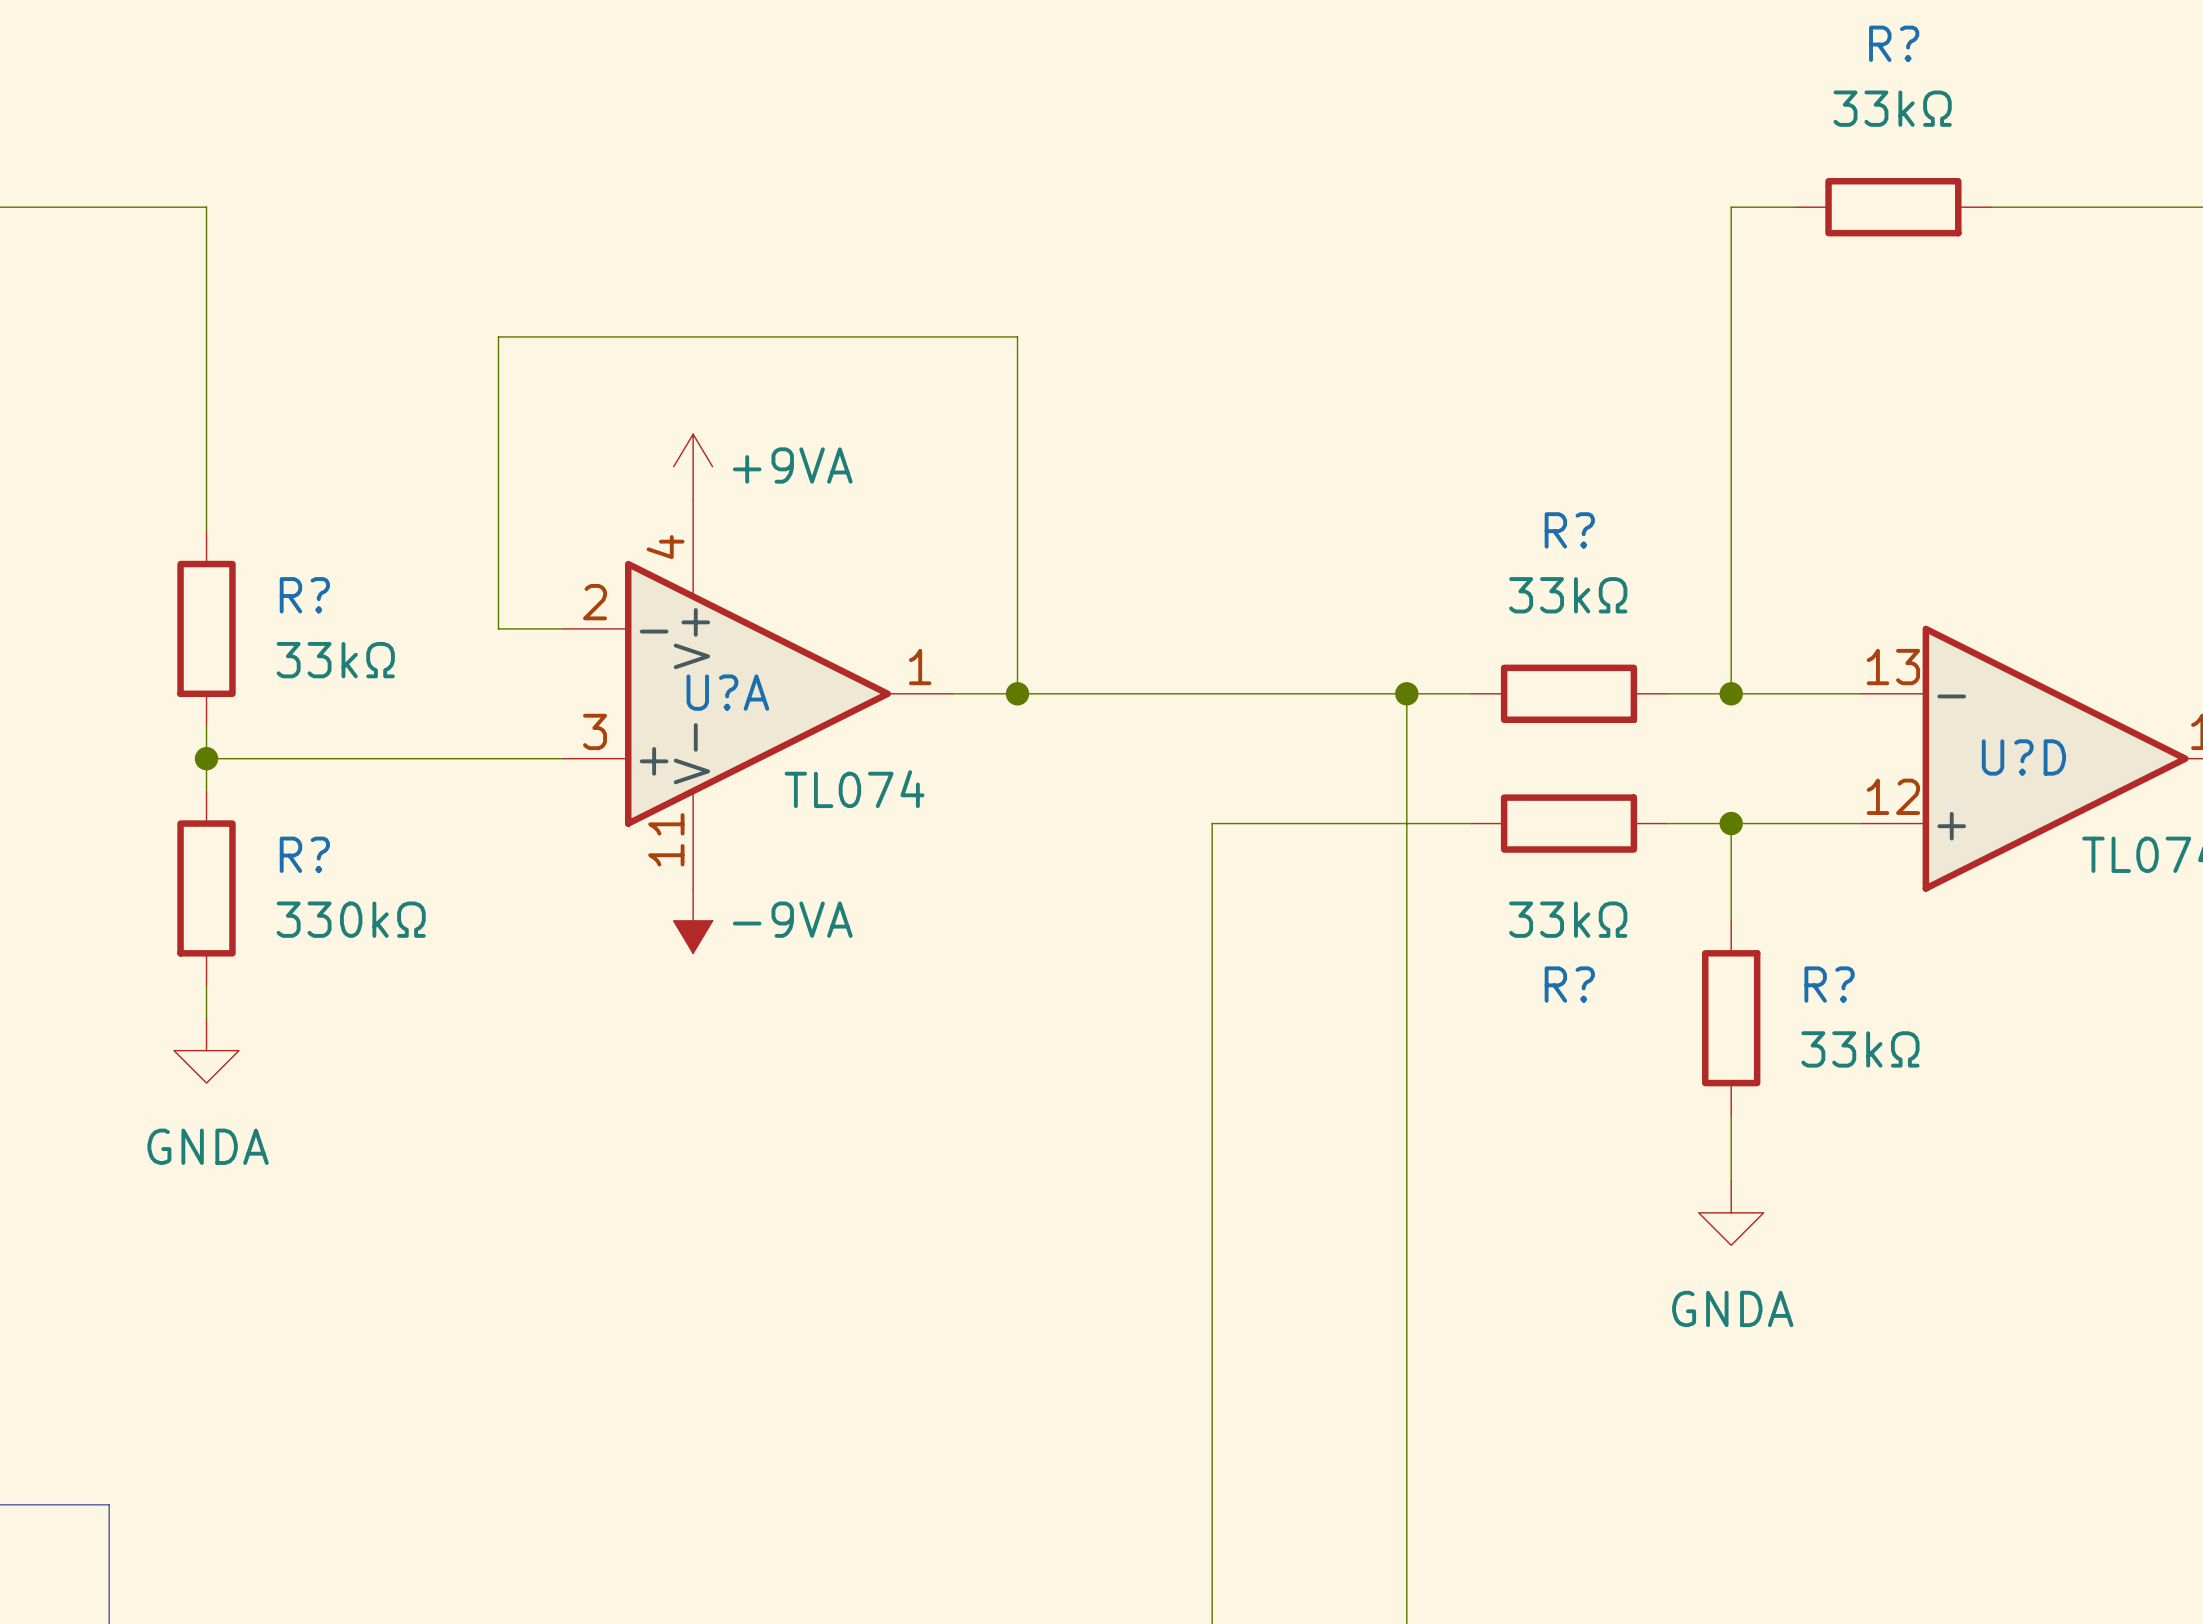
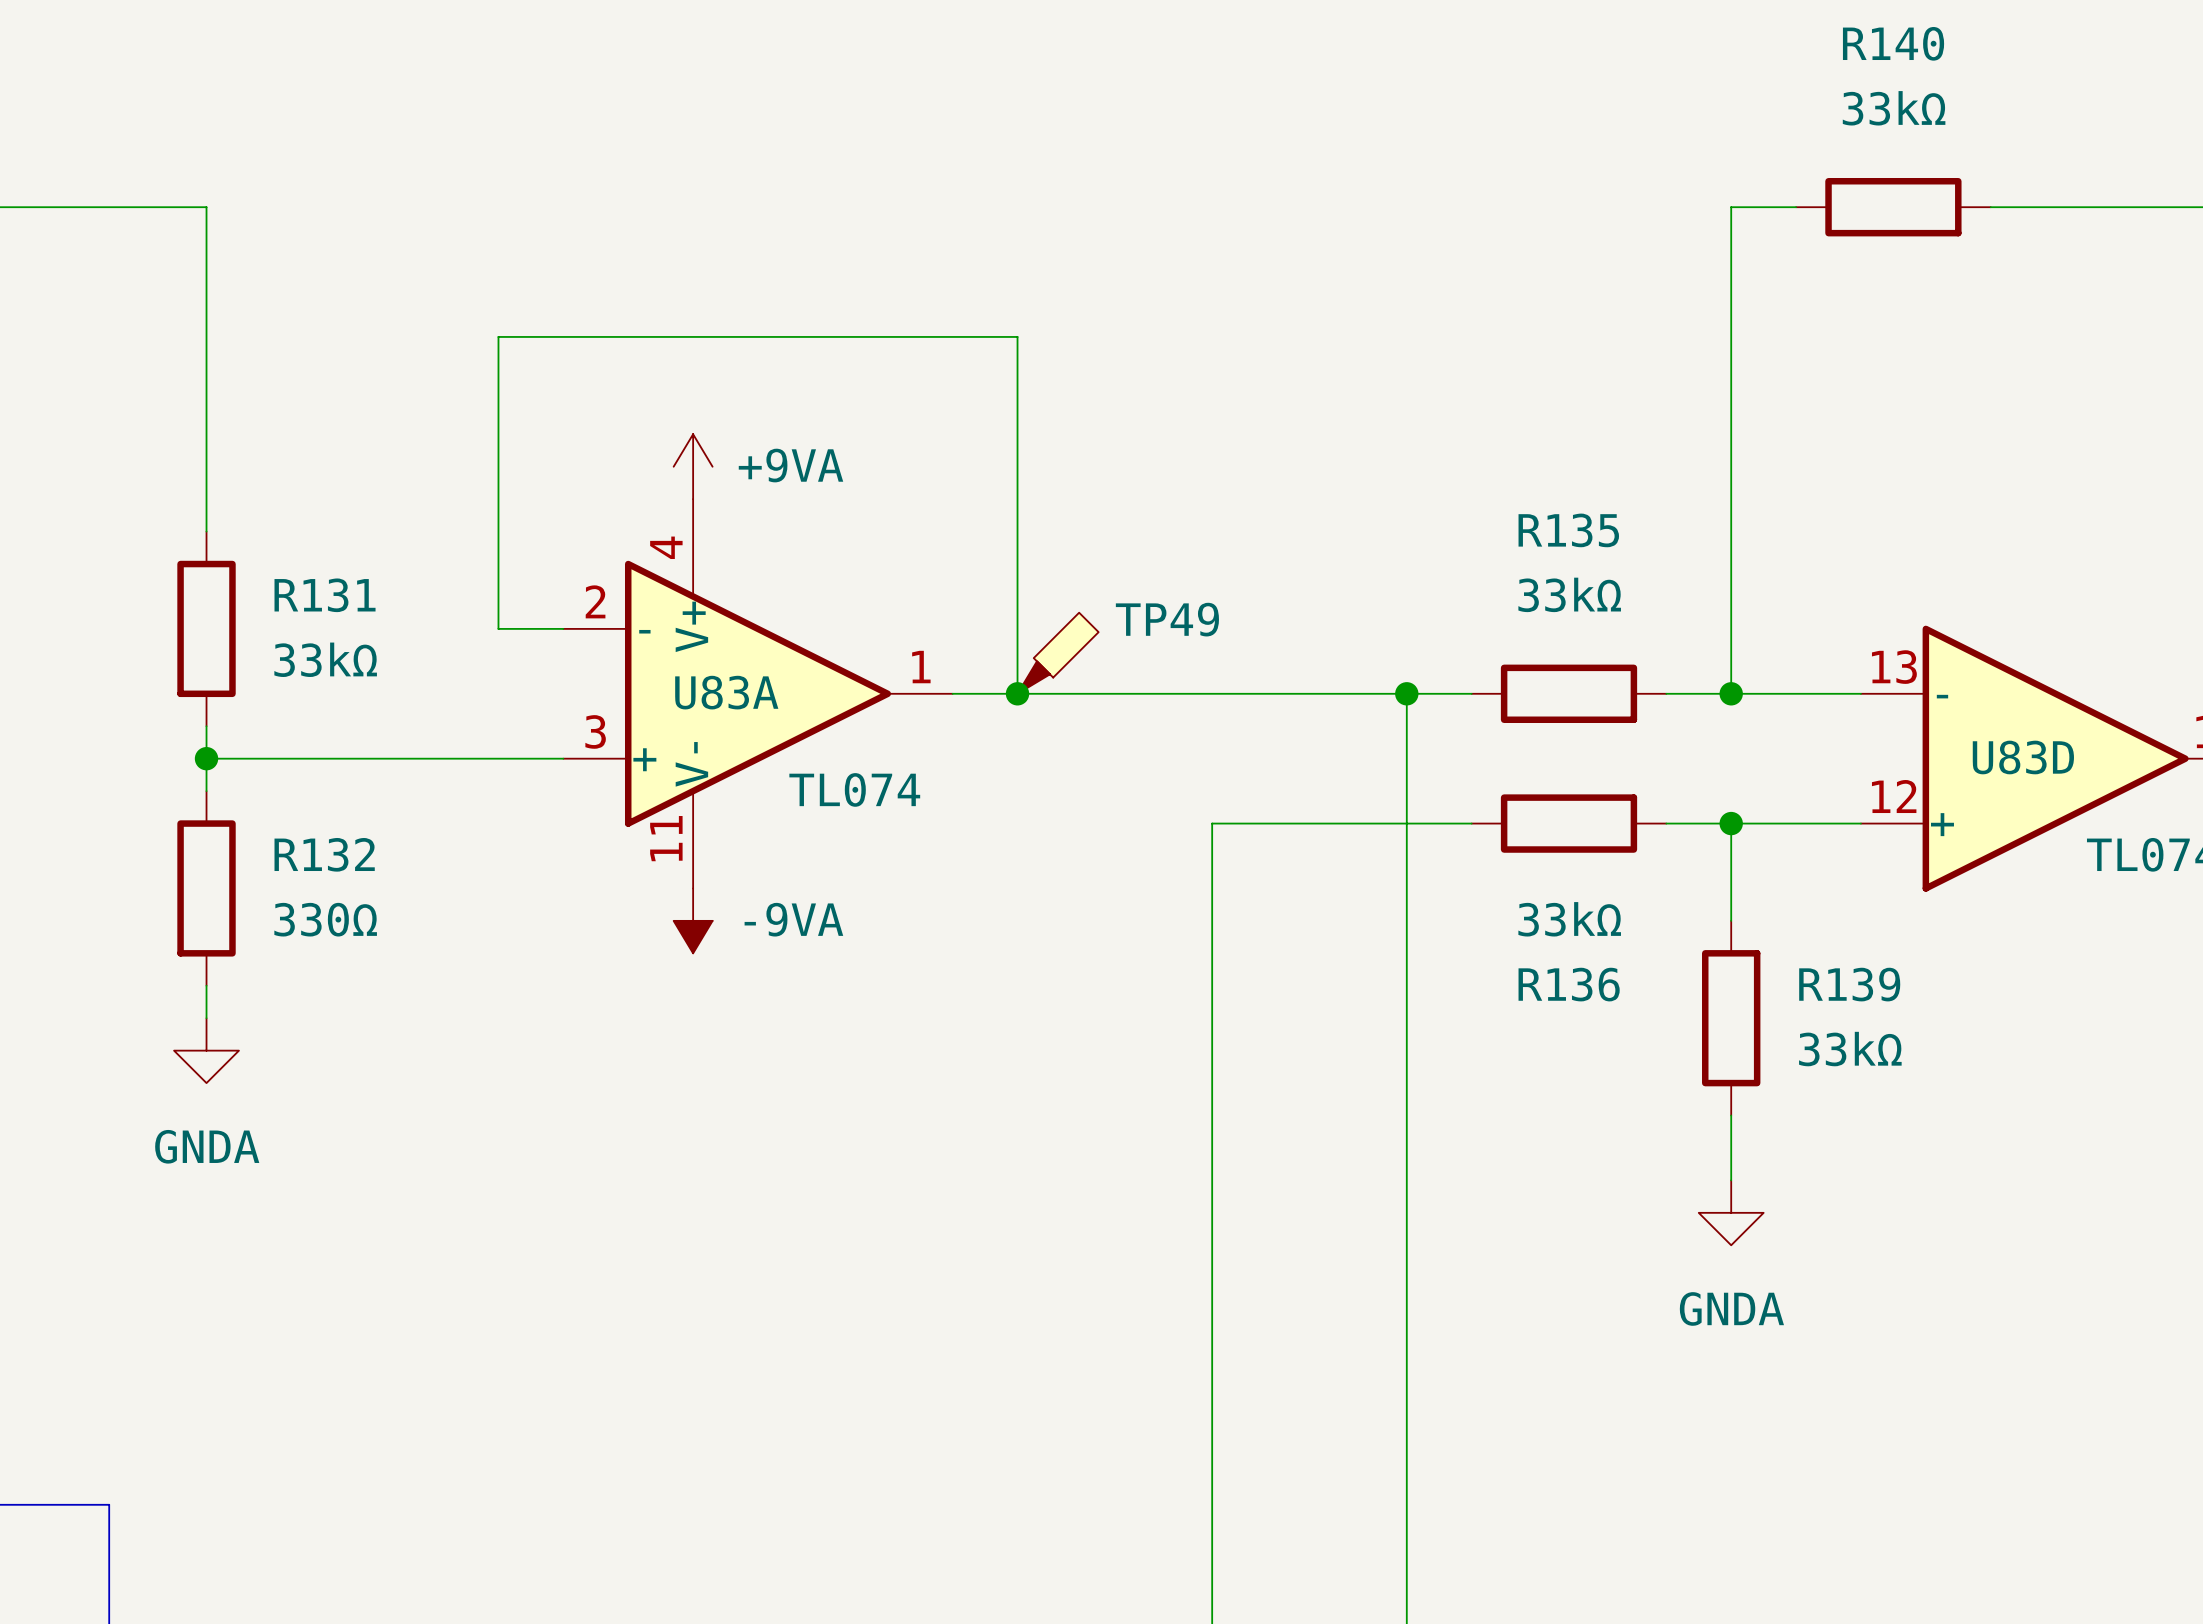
R? name: R? (1894, 43) -> R140 (1893, 43)
R? name: R? (1569, 530) -> R135 (1568, 530)
R? name: R? (304, 595) -> R131 (325, 595)
TP49: none -> (1058, 653)
U?A name: U?A (727, 692) -> U83A (726, 692)
U?D name: U?D (2023, 757) -> U83D (2023, 757)
R? name: R? (304, 854) -> R132 (324, 854)
R? value: 330kΩ (351, 919) -> 330Ω (325, 919)
R? name: R? (1569, 984) -> R136 (1569, 984)
R? name: R? (1829, 984) -> R139 (1849, 984)

